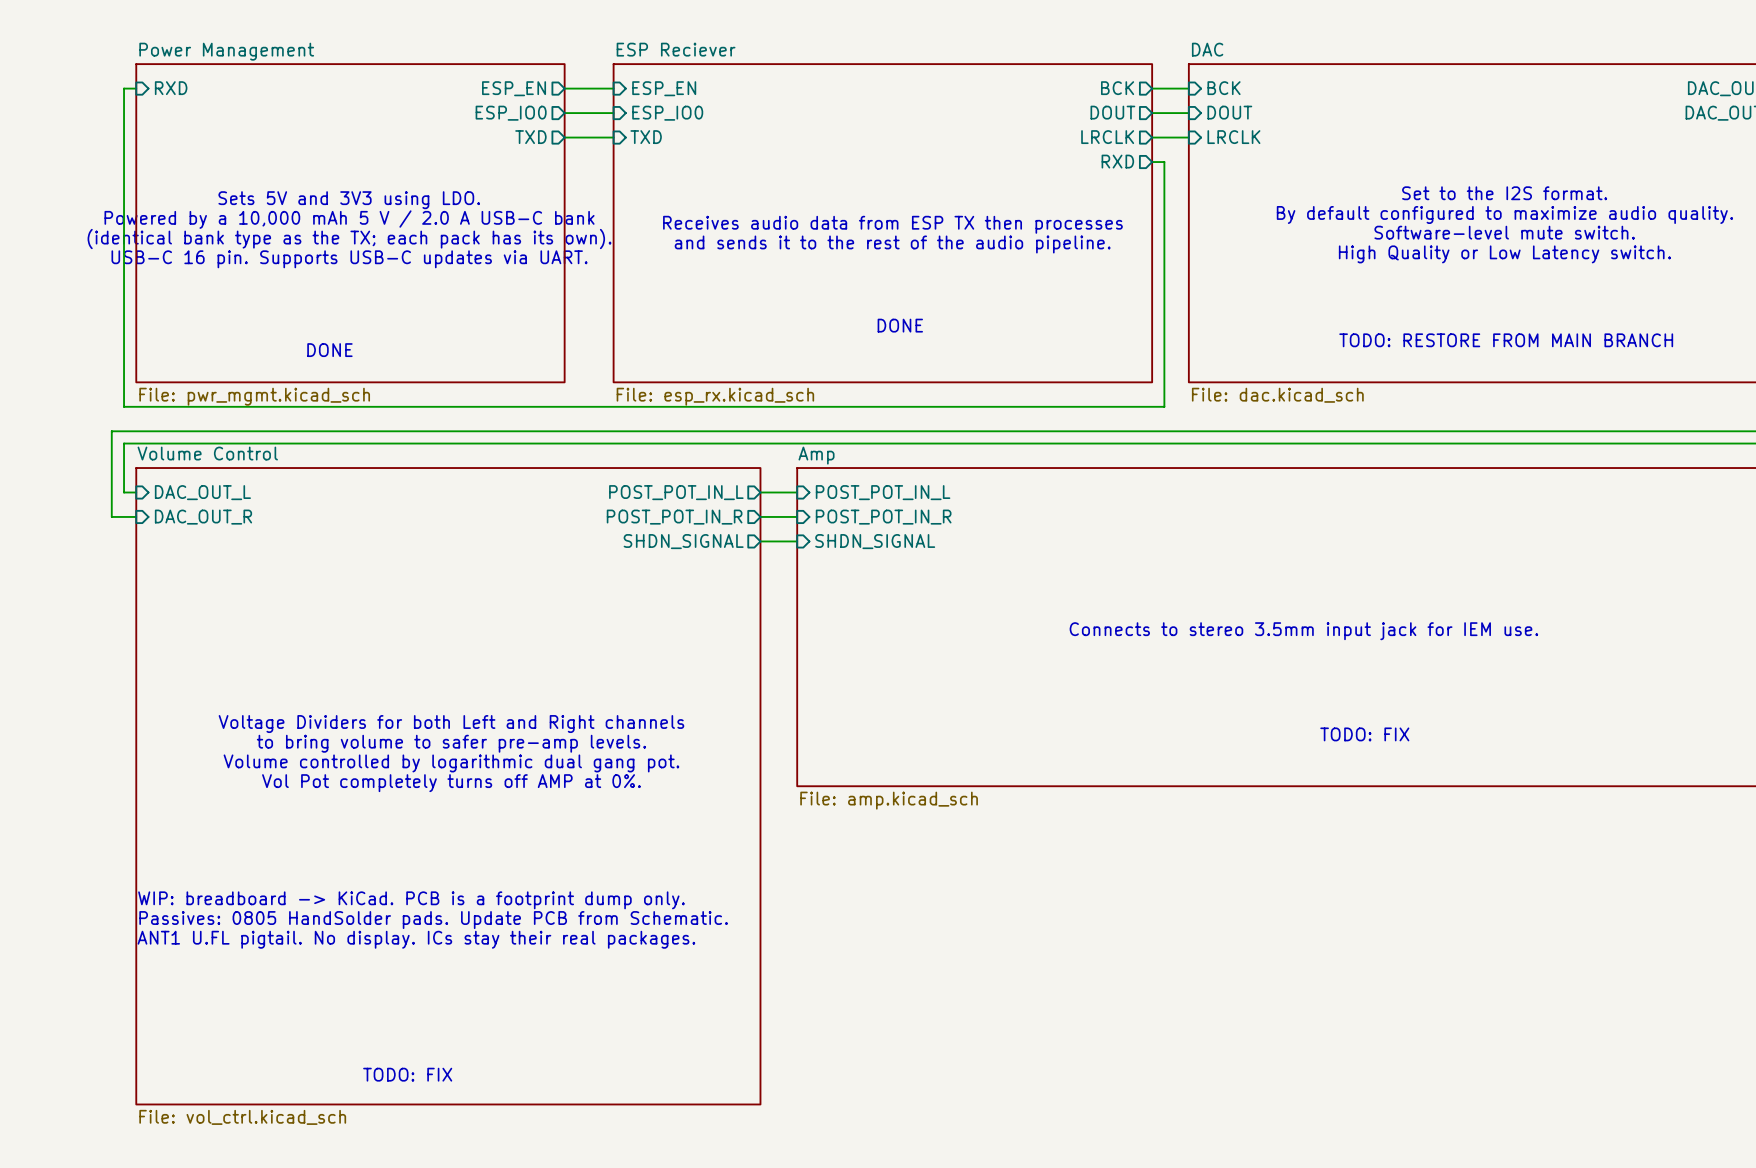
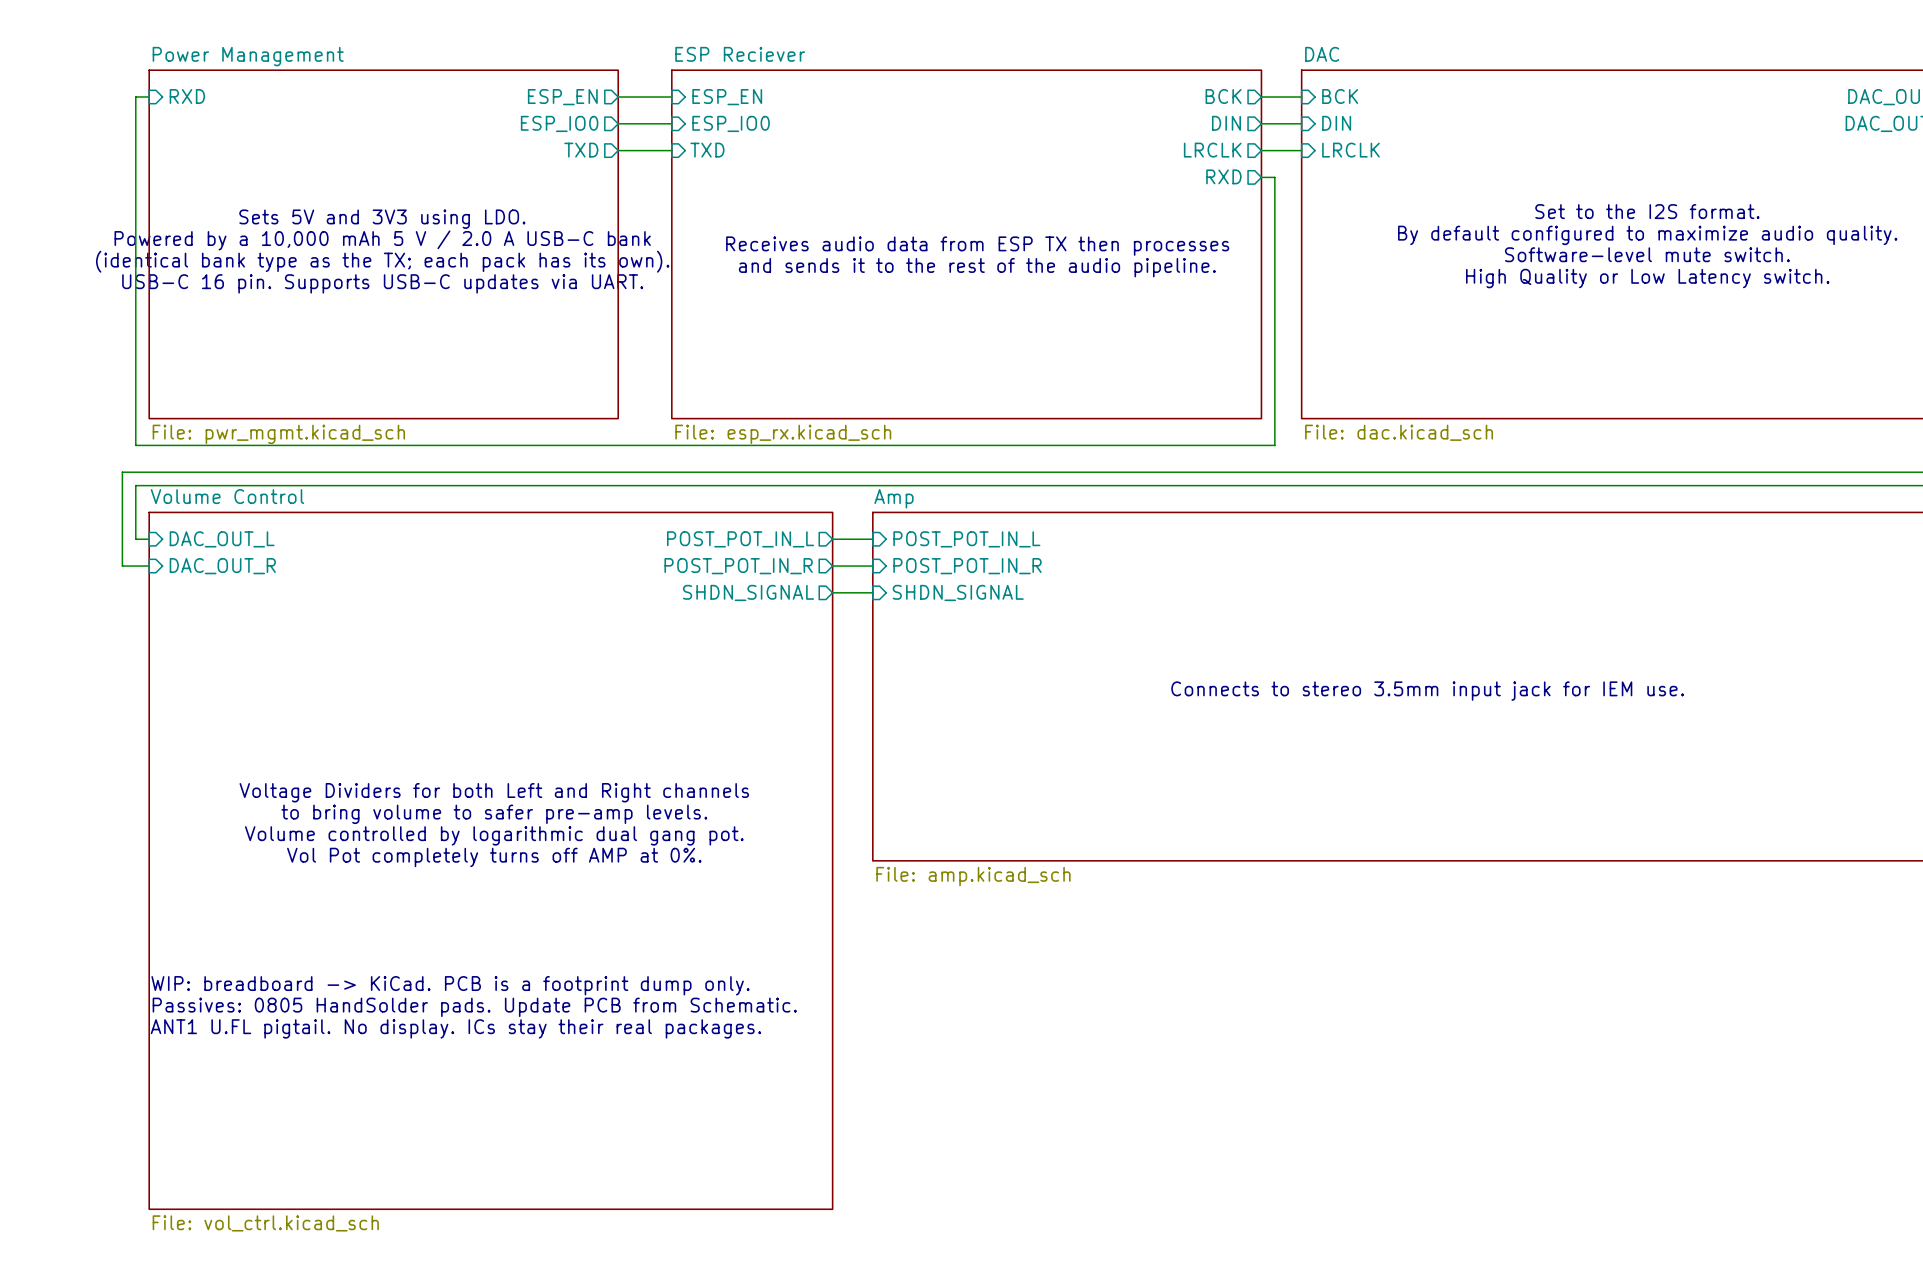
sheet pin: DOUT (1112, 112) -> DIN (1226, 123)
sheet pin: DOUT (1229, 112) -> DIN (1336, 123)
text: DONE (900, 325) -> none
text: TODO: RESTORE FROM MAIN BRANCH (1506, 340) -> none
text: DONE (329, 350) -> none
text: TODO: FIX (1364, 734) -> none
text: TODO: FIX (407, 1074) -> none

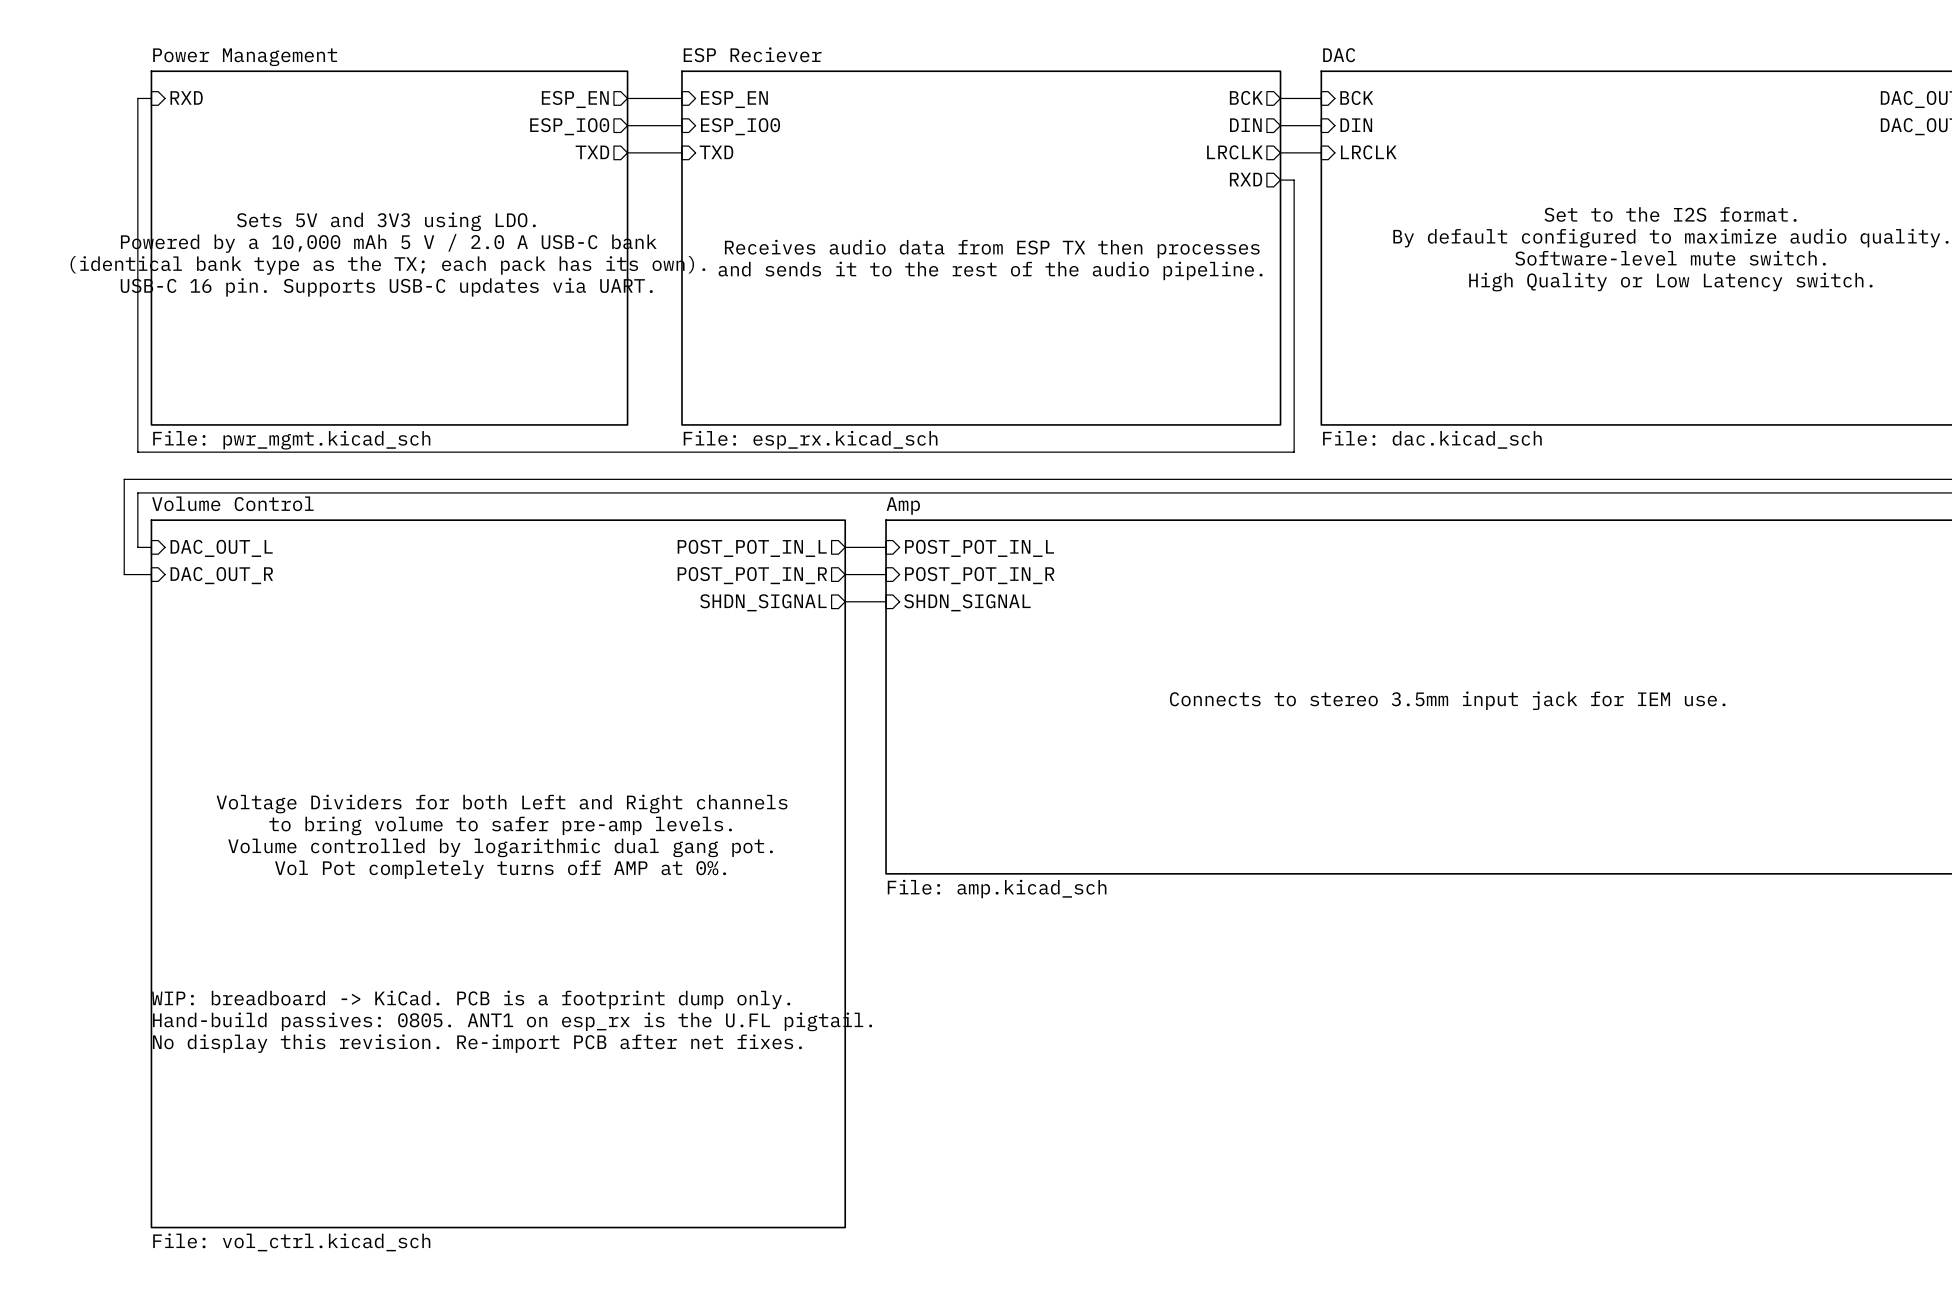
text: Passives: 0805 HandSolder pads. Update PCB from Schematic. (474, 1007) -> Hand-build passives: 0805. ANT1 on esp_rx is the U.FL pigtail. (512, 1021)
text: ANT1 U.FL pigtail. No display. ICs stay their real packages. (455, 1028) -> No display this revision. Re-import PCB after net fixes. (477, 1043)

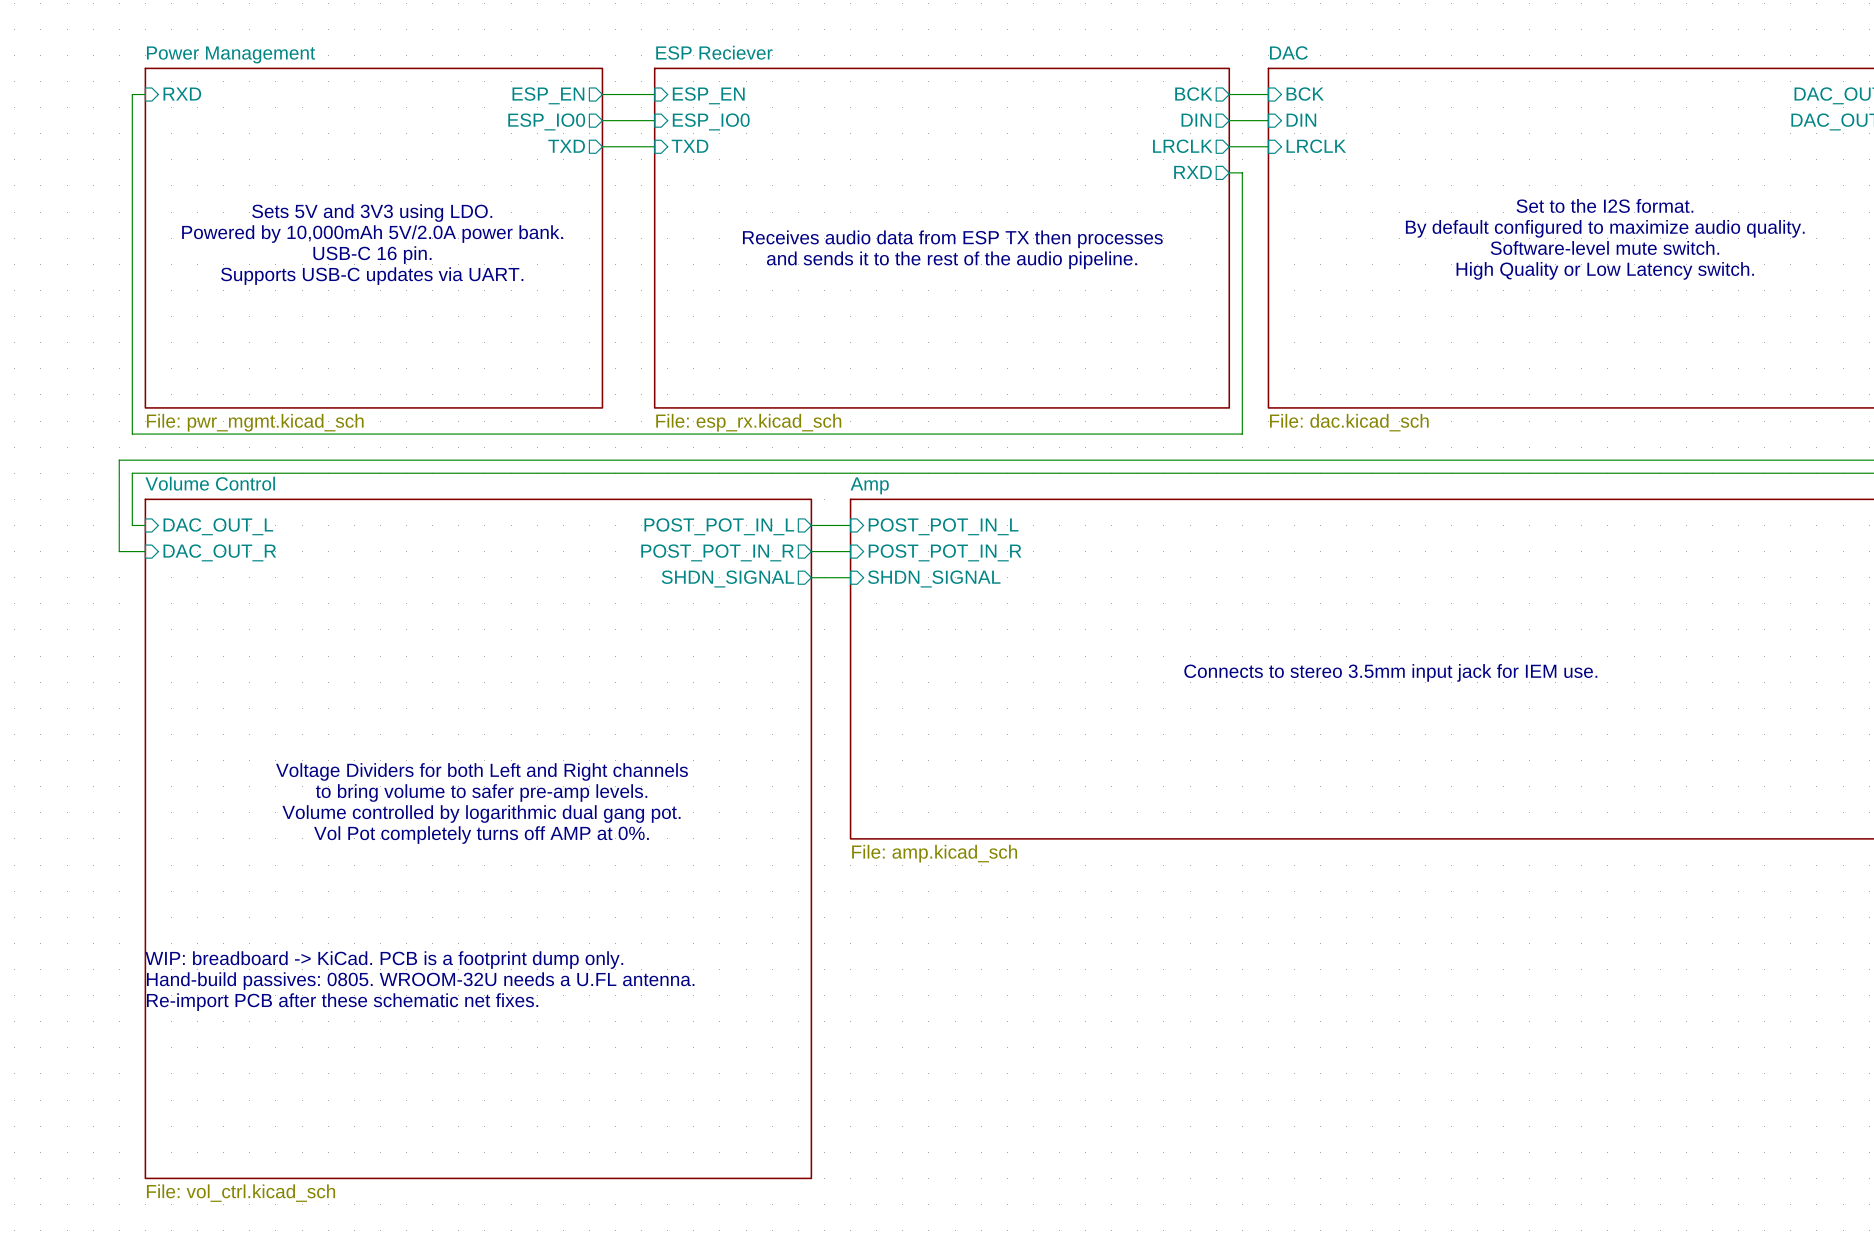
text: Powered by a 10,000 mAh 5 V / 2.0 A USB-C bank (388, 243) -> Powered by 10,000mAh 5V/2.0A power bank. (372, 234)
text: (identical bank type as the TX; each pack has its own). (387, 265) -> USB-C 16 pin. (372, 255)
text: USB-C 16 pin. Supports USB-C updates via UART. (386, 287) -> Supports USB-C updates via UART. (372, 276)
text: Hand-build passives: 0805. ANT1 on esp_rx is the U.FL pigtail. (512, 1021) -> Hand-build passives: 0805. WROOM-32U needs a U.FL antenna. (420, 981)
text: No display this revision. Re-import PCB after net fixes. (477, 1043) -> Re-import PCB after these schematic net fixes. (342, 1002)

